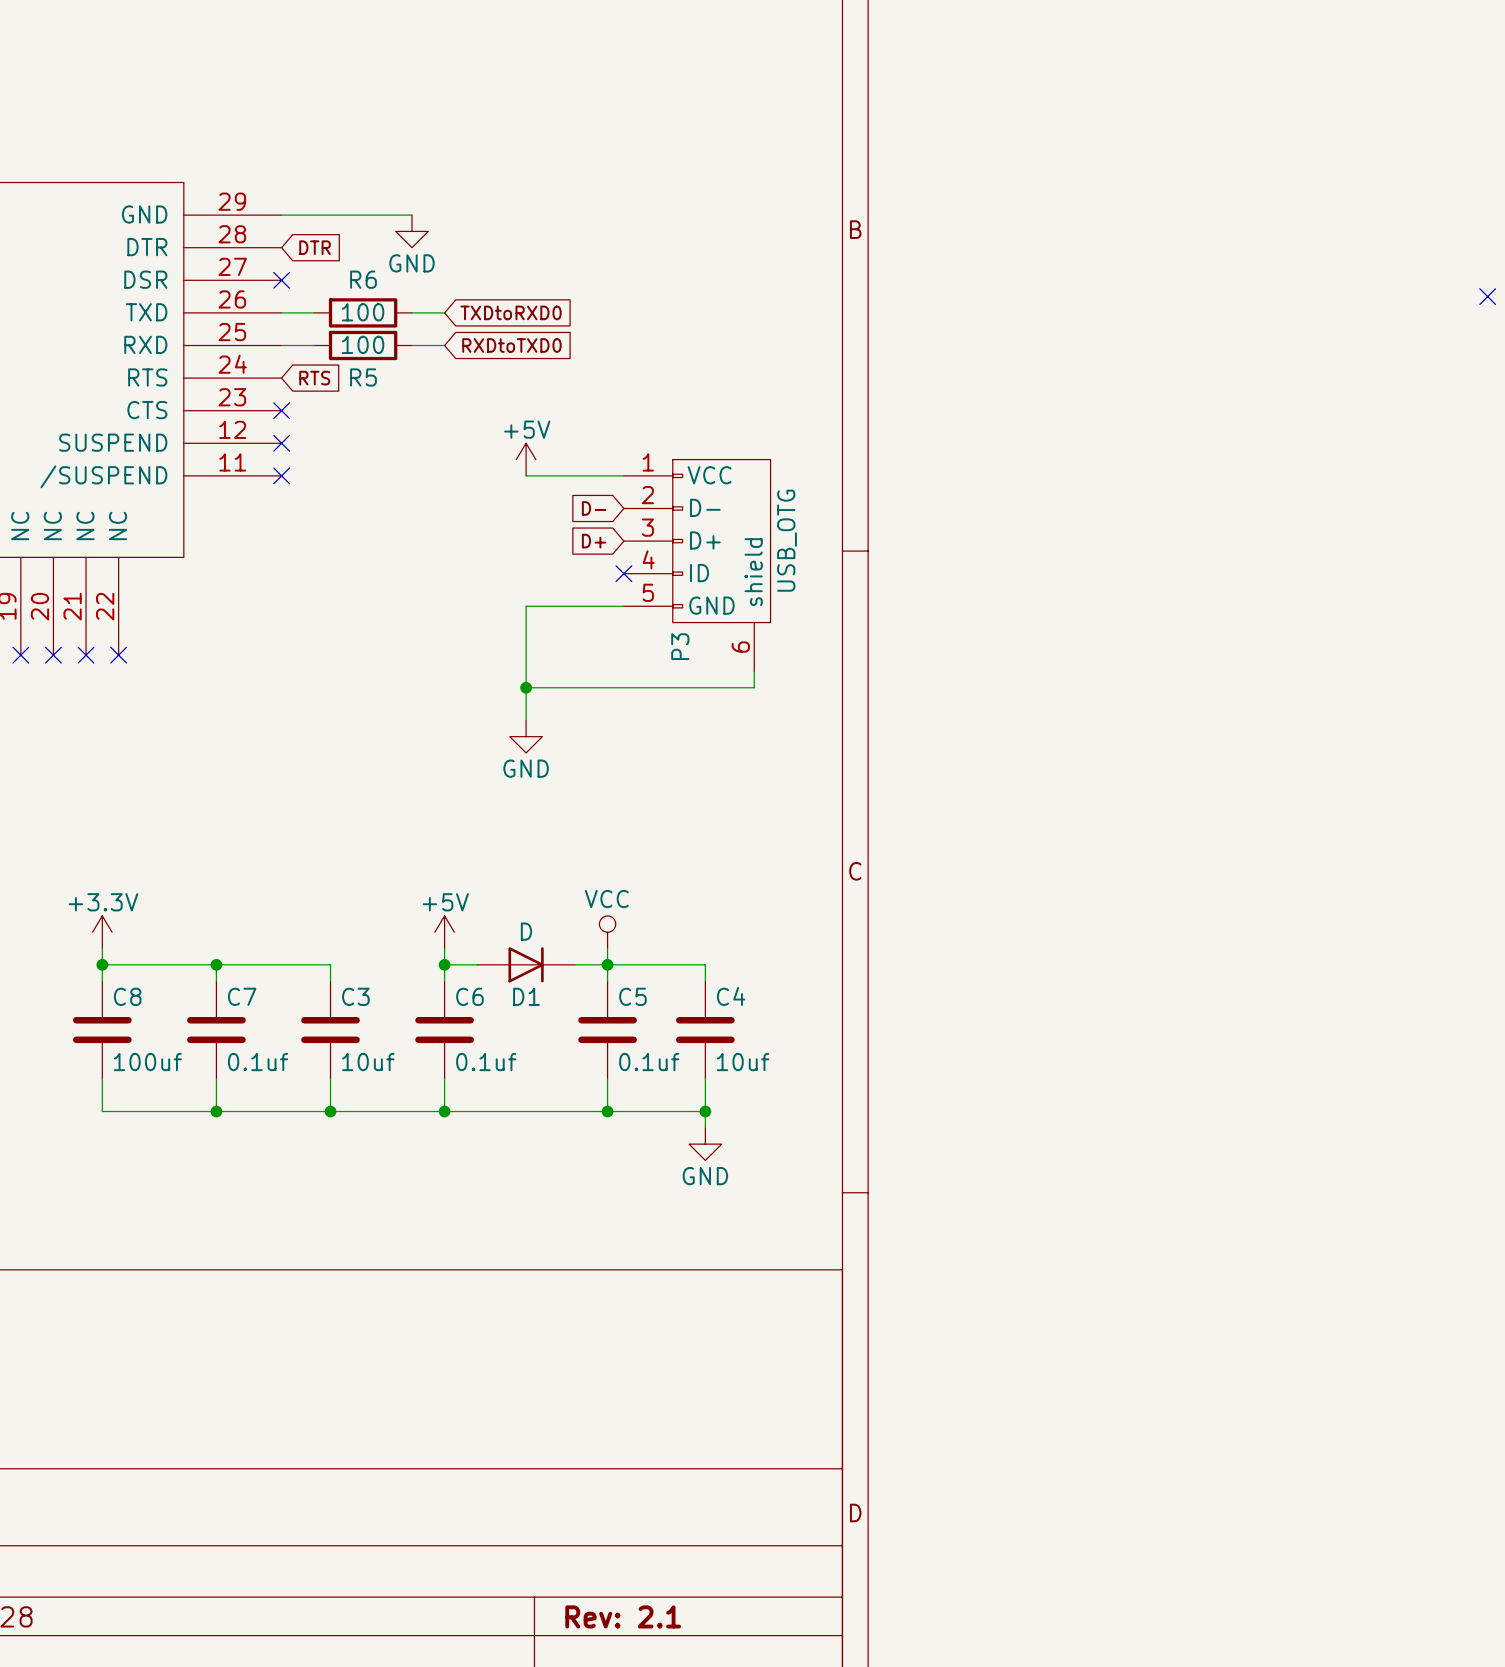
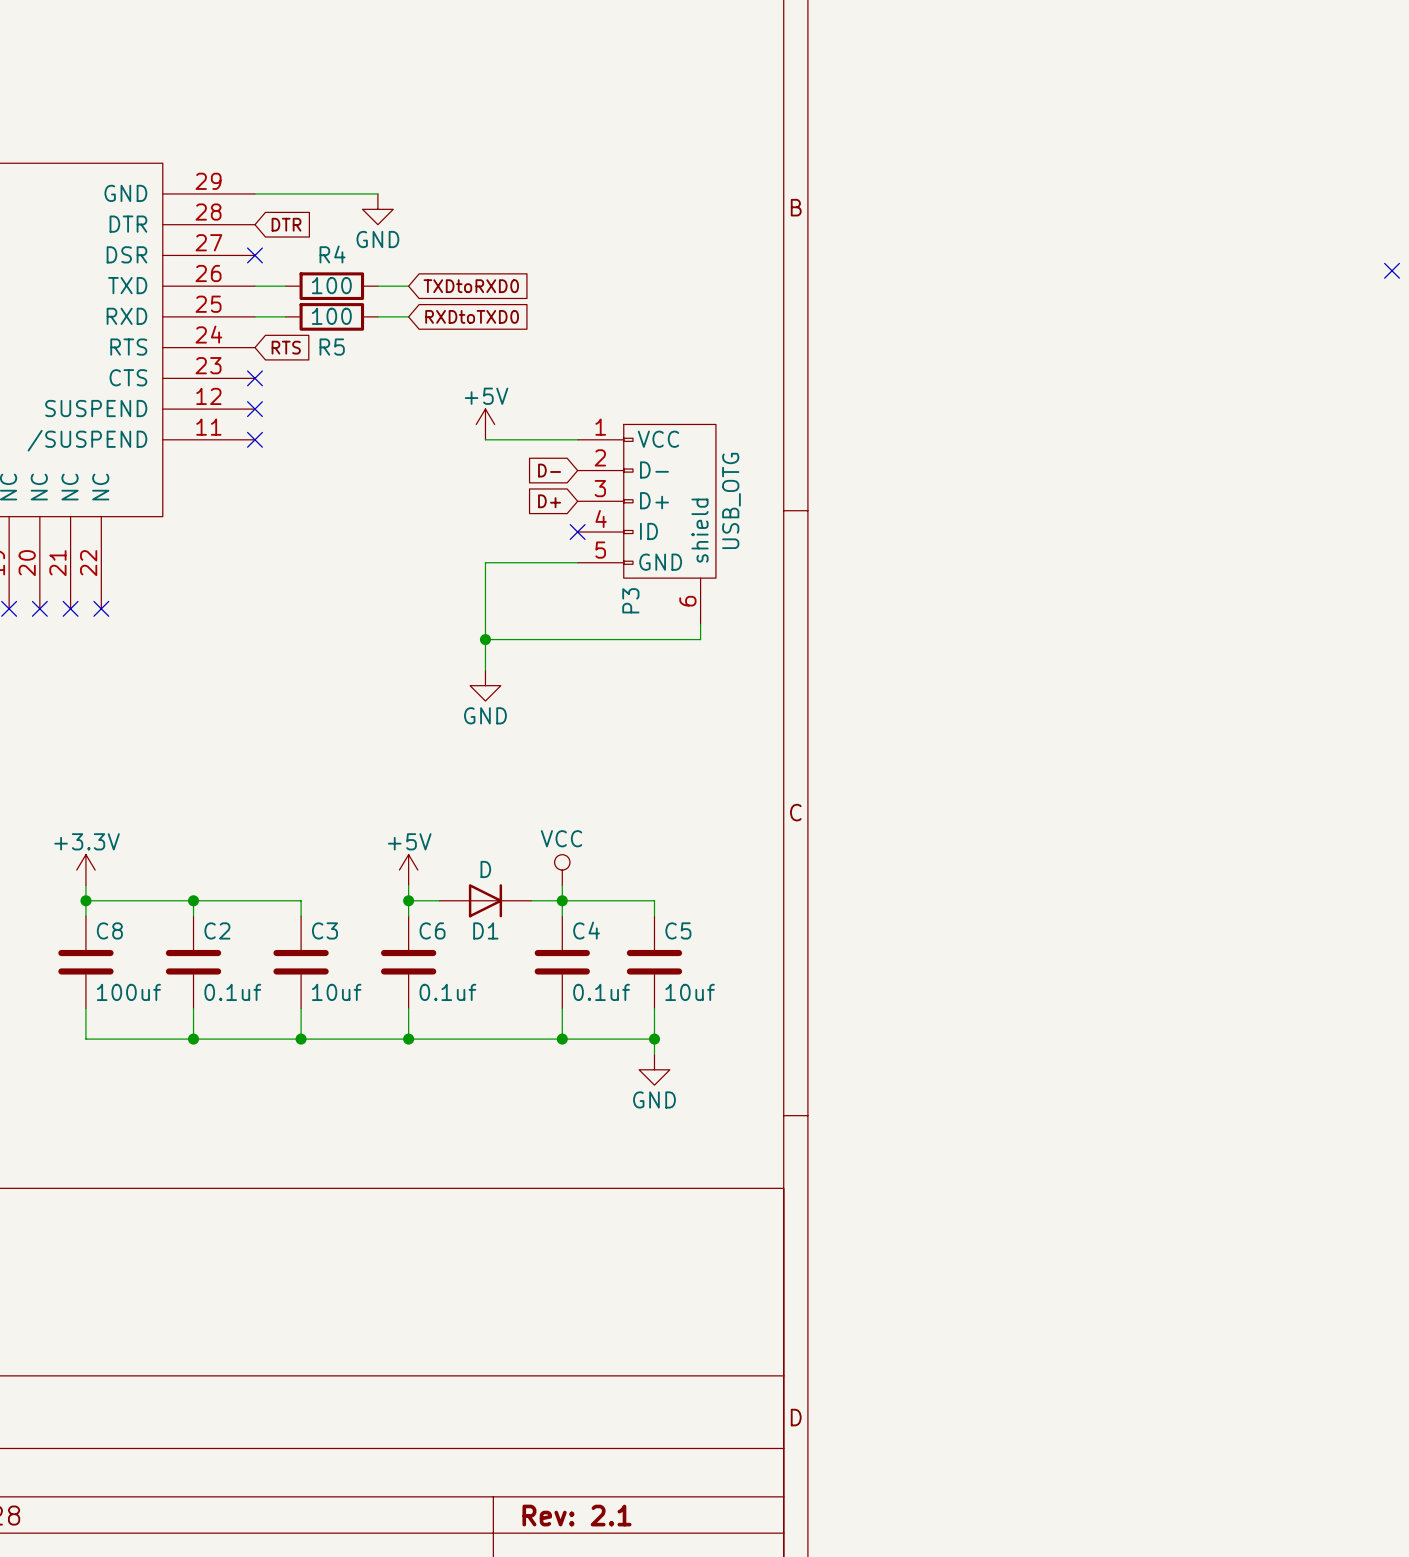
R6 name: R6 (363, 279) -> R4 (332, 254)
C7 name: C7 (242, 996) -> C2 (217, 930)
C5 name: C5 (632, 996) -> C4 (586, 930)
C4 name: C4 (731, 996) -> C5 (678, 930)

